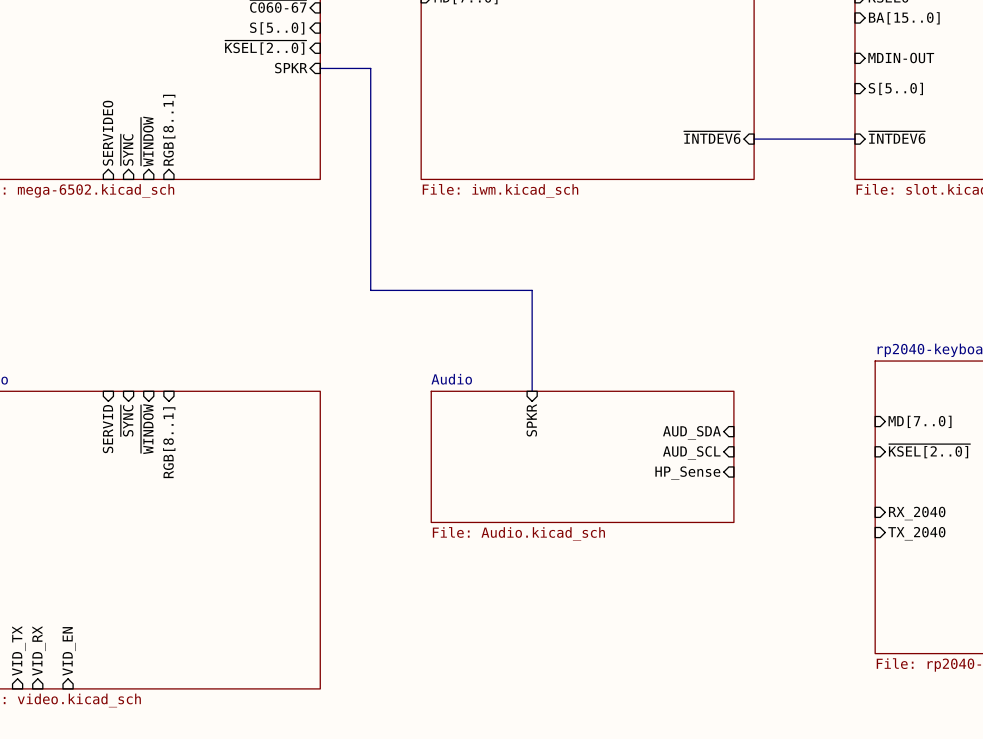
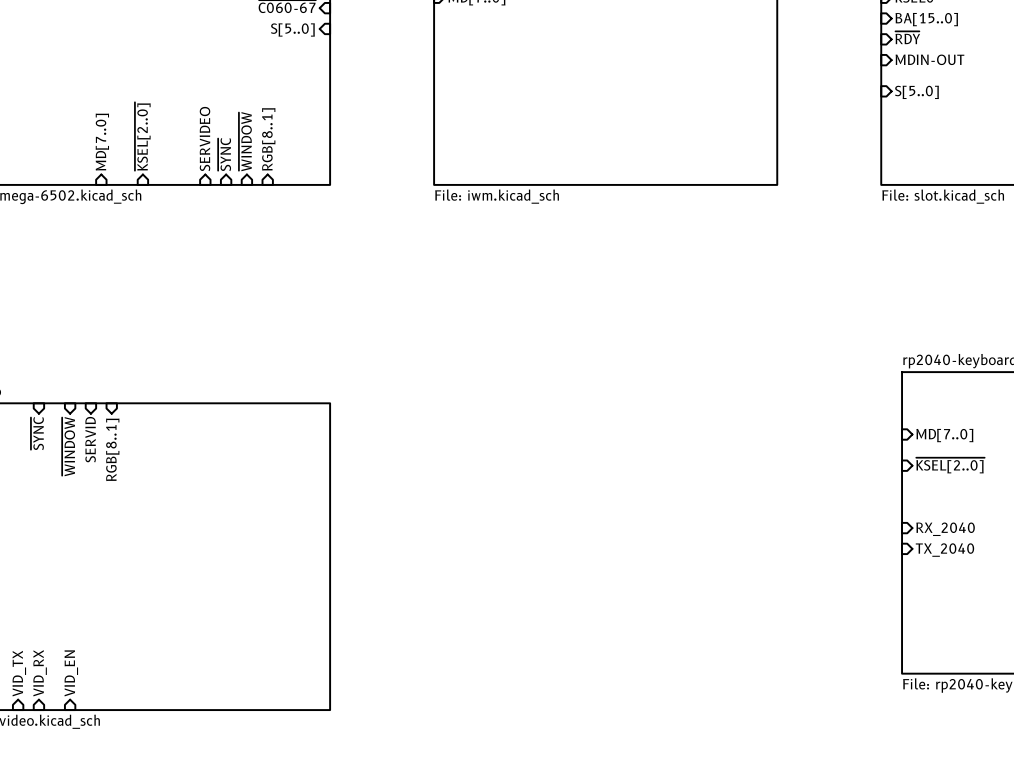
sheet pin: none -> ~{RDY} (907, 37)
sheet pin: ~{KSEL[2..0]} (265, 47) -> none
sheet pin: SPKR (291, 68) -> none
wire: (320, 68) (370, 68) (370, 290) (532, 290) (532, 391) -> none
sheet pin: none -> ~{KSEL[2..0]} (142, 136)
sheet pin position: RGB[8..1] (169, 130) -> RGB[8..1] (268, 139)
sheet pin position: SERVIDEO (108, 133) -> SERVIDEO (205, 139)
sheet pin: none -> MD[7..0] (102, 142)
sheet pin: ~{INTDEV6} (712, 137) -> none
sheet pin: ~{INTDEV6} (897, 137) -> none
wire: (754, 139) (854, 139) -> none
sheet pin position: ~{WINDOW} (147, 141) -> ~{WINDOW} (245, 141)
sheet pin position: ~{SYNC} (127, 149) -> ~{SYNC} (224, 154)
sheet pin position: ~{SYNC} (127, 420) -> ~{SYNC} (37, 433)
sheet pin: SPKR (531, 420) -> none
sheet pin: none -> SERVID (90, 439)
sheet pin: SERVID (108, 429) -> RGB[8..1] (112, 449)
sheet pin position: ~{WINDOW} (147, 429) -> ~{WINDOW} (68, 446)
sheet pin: AUD_SDA (691, 432) -> none
sheet pin: RGB[8..1] (169, 442) -> none
sheet pin: AUD_SCL (691, 452) -> none
sheet Audio: File: Audio.kicad_sch (582, 456) -> none
sheet pin: HP_Sense (687, 473) -> none

